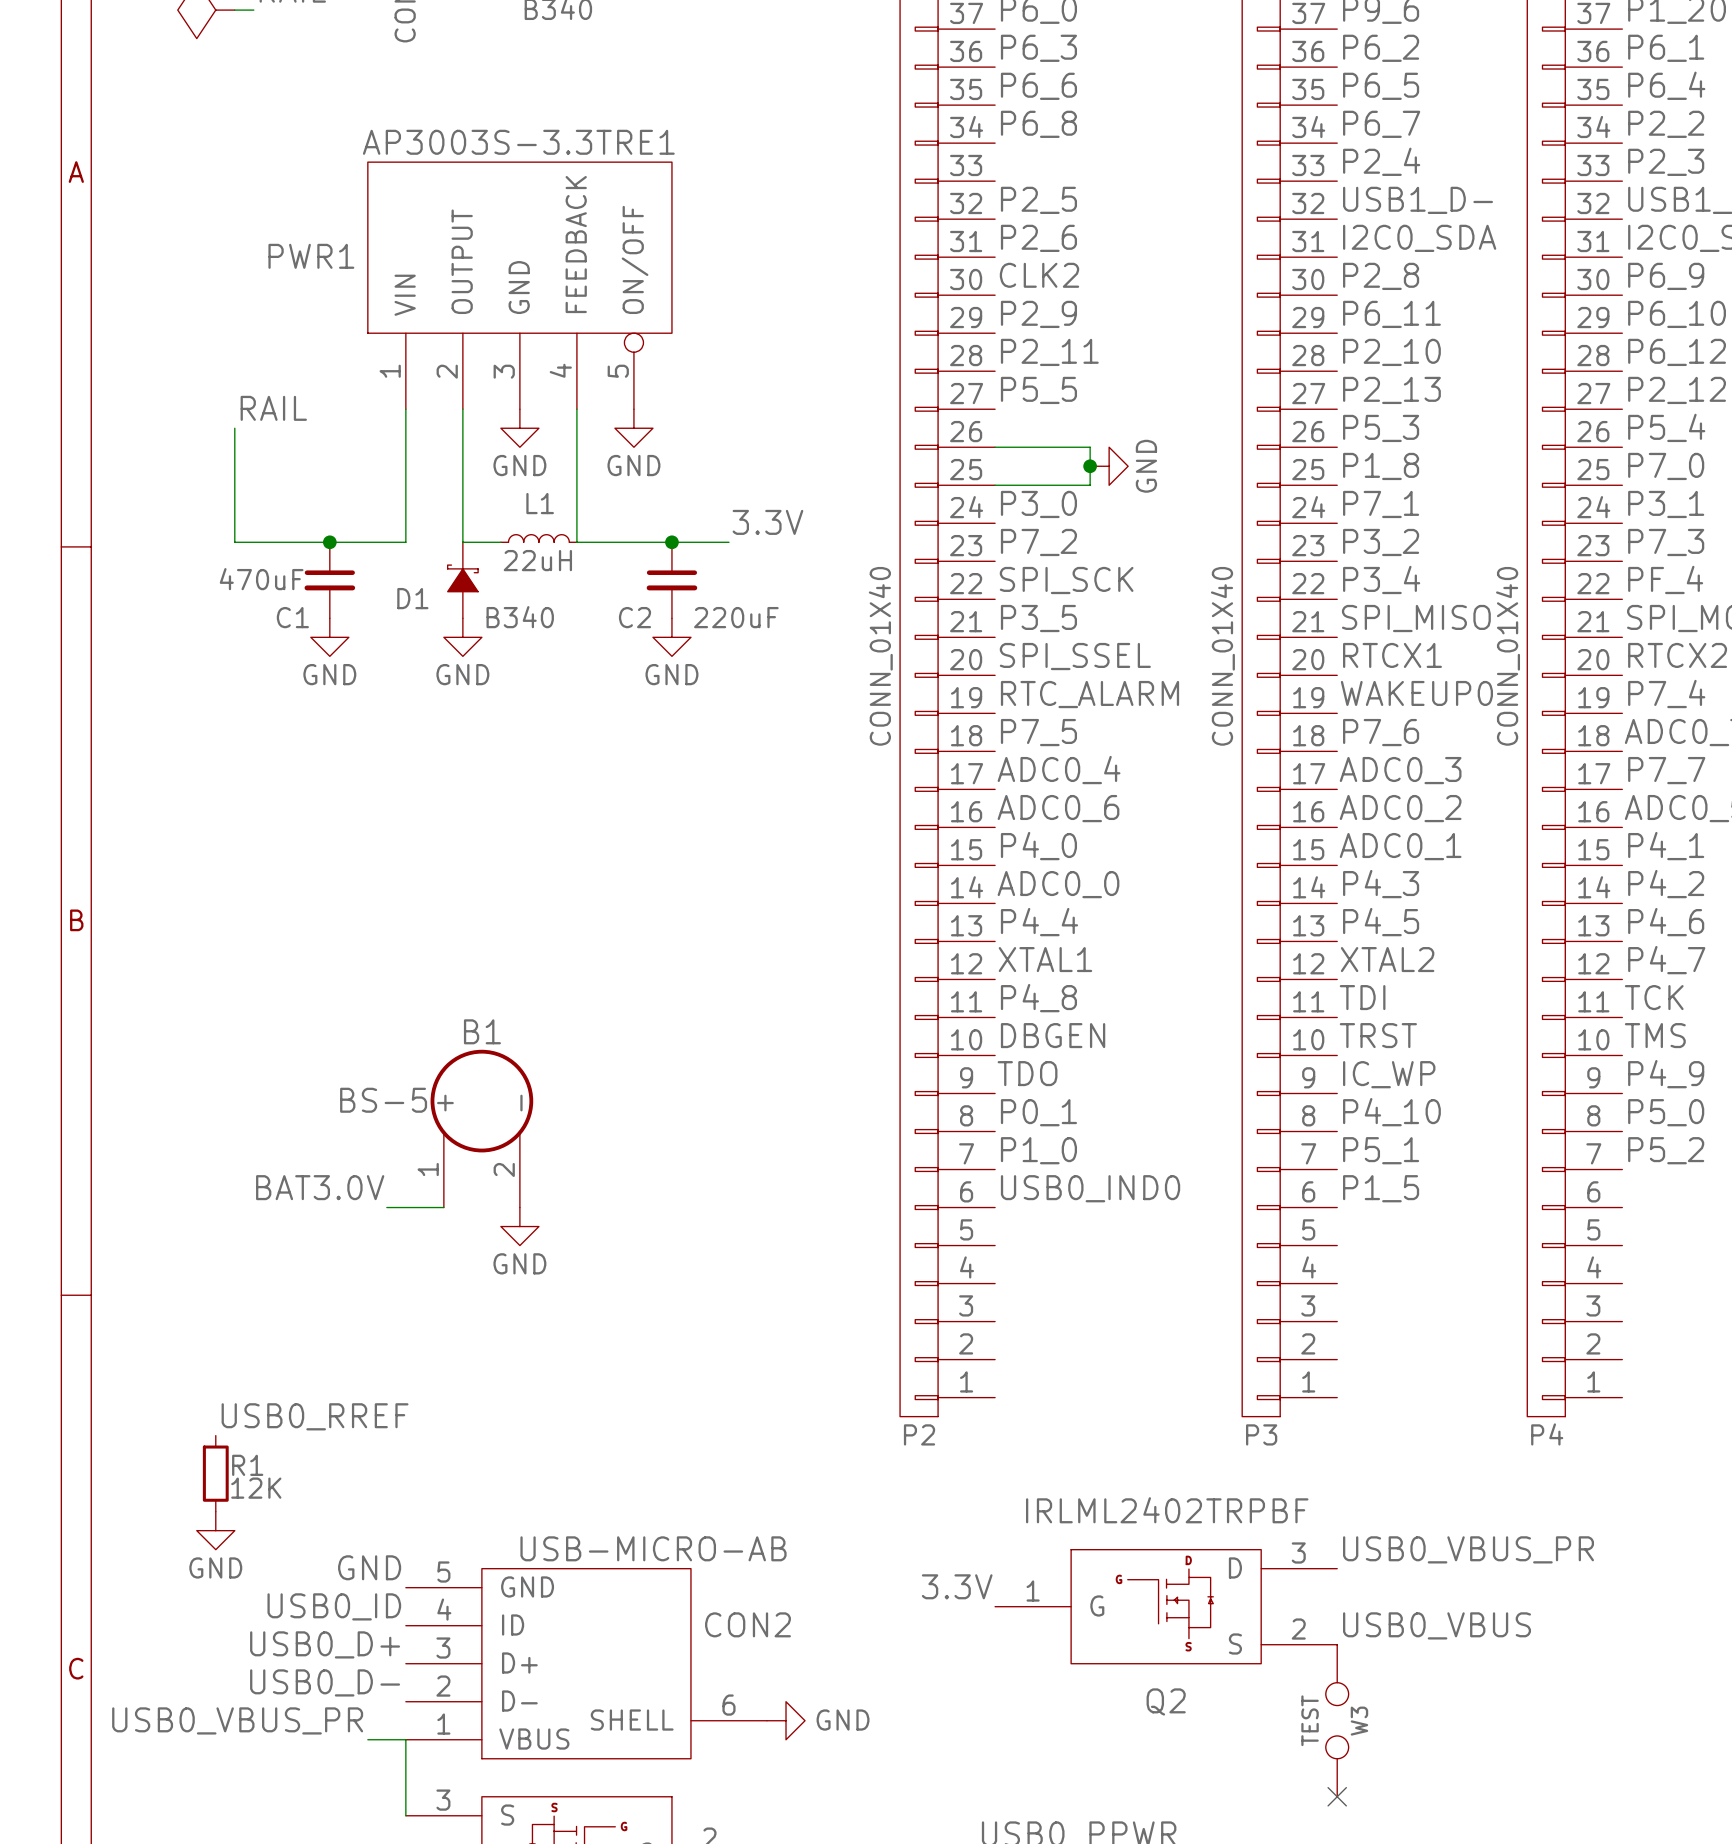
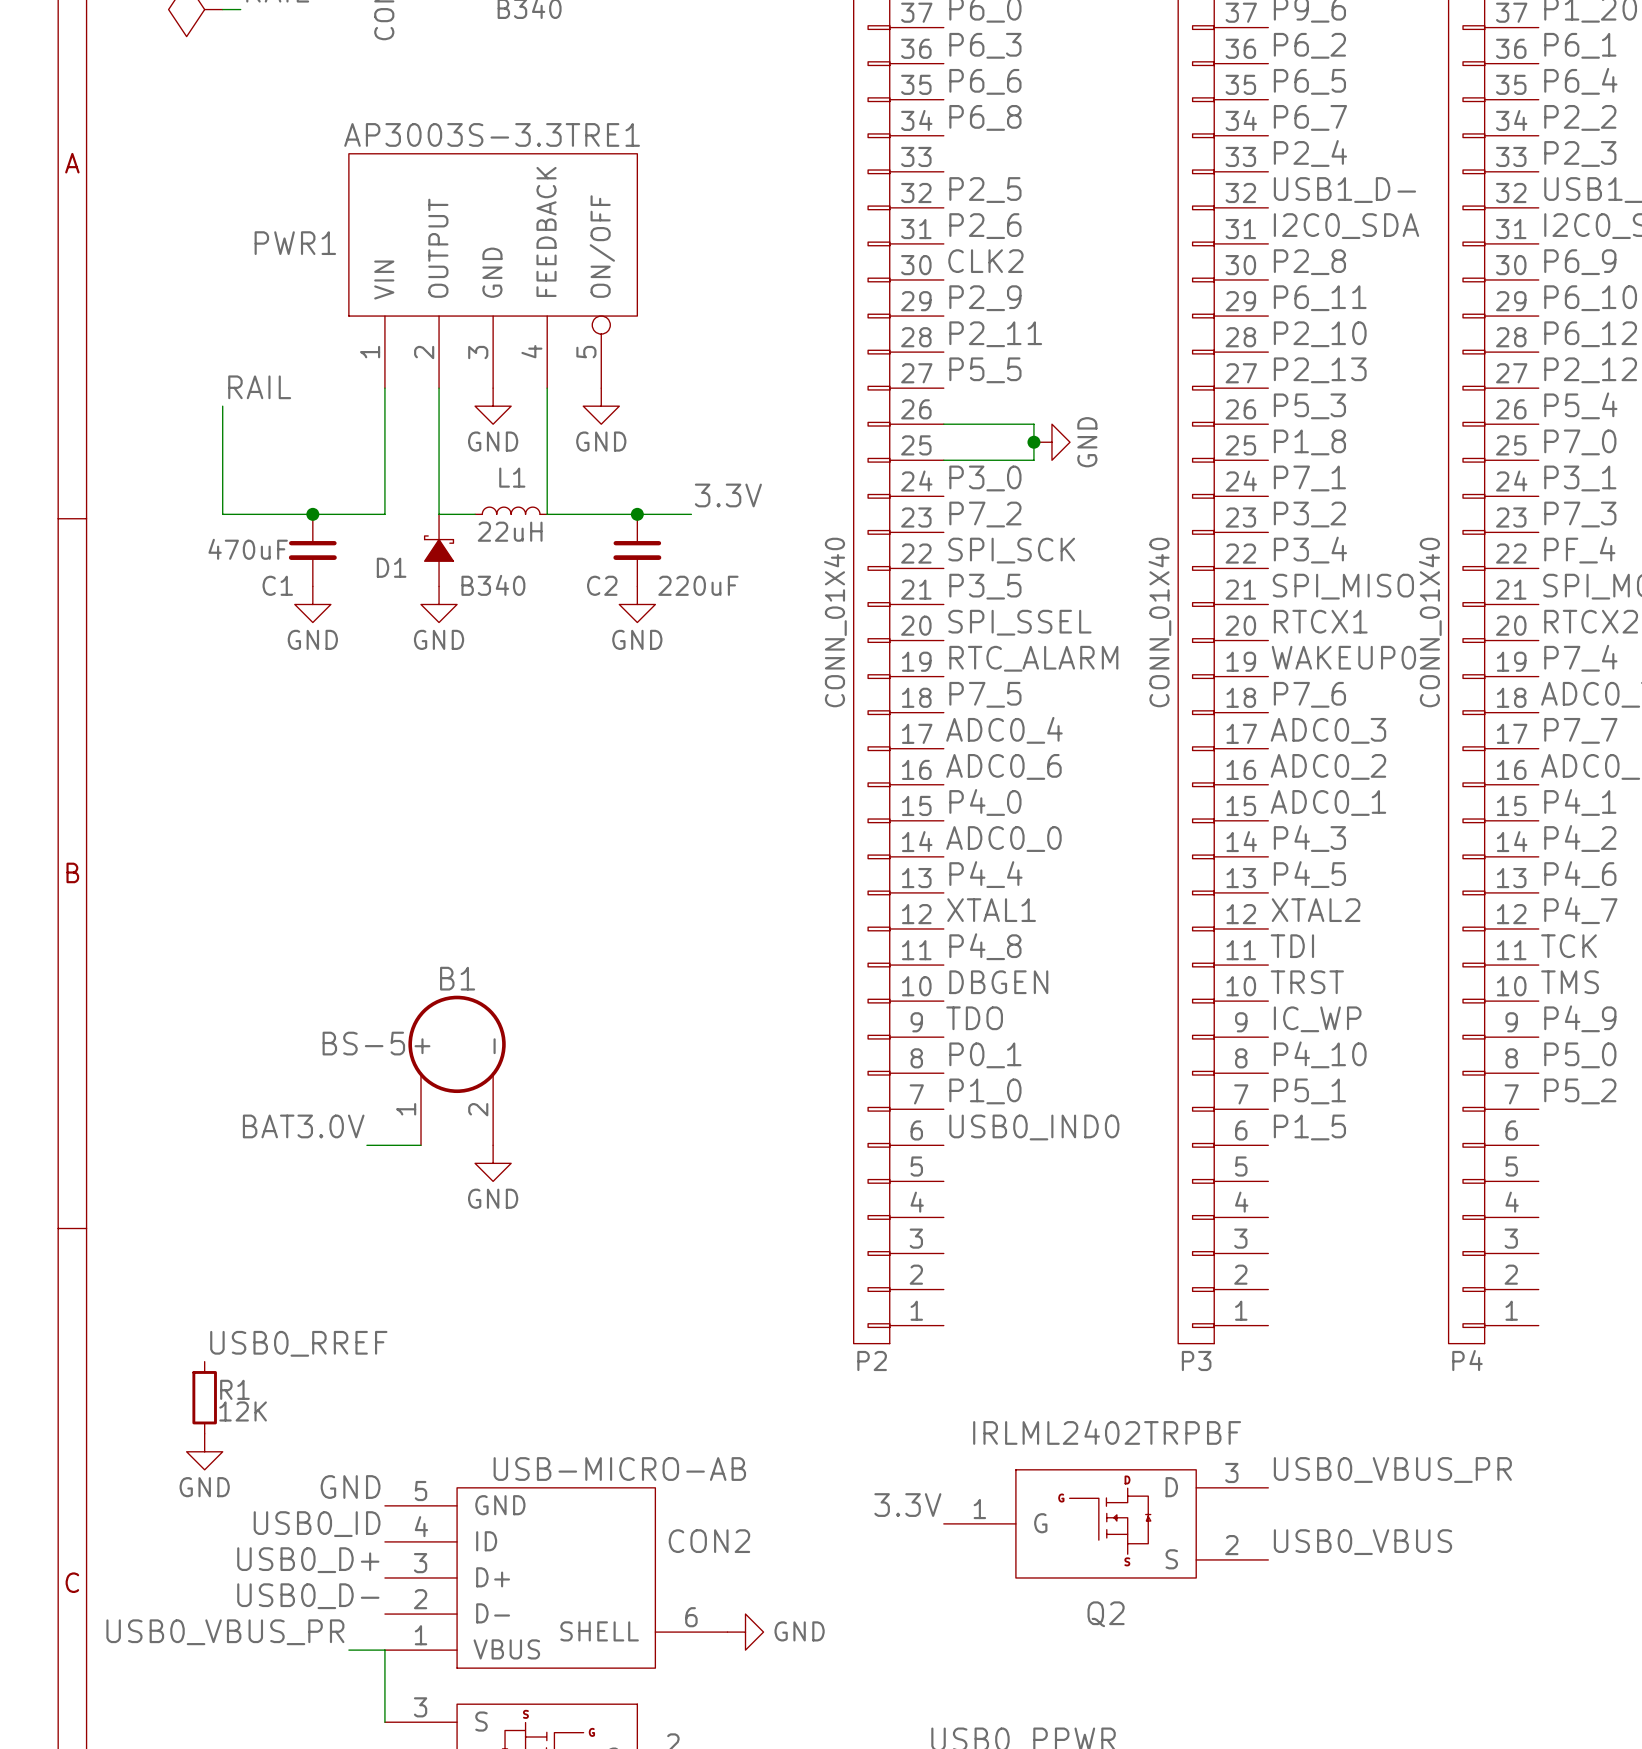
W3: TEST (1337, 1720) -> none
no-connect mark: (1337, 1796) -> none

